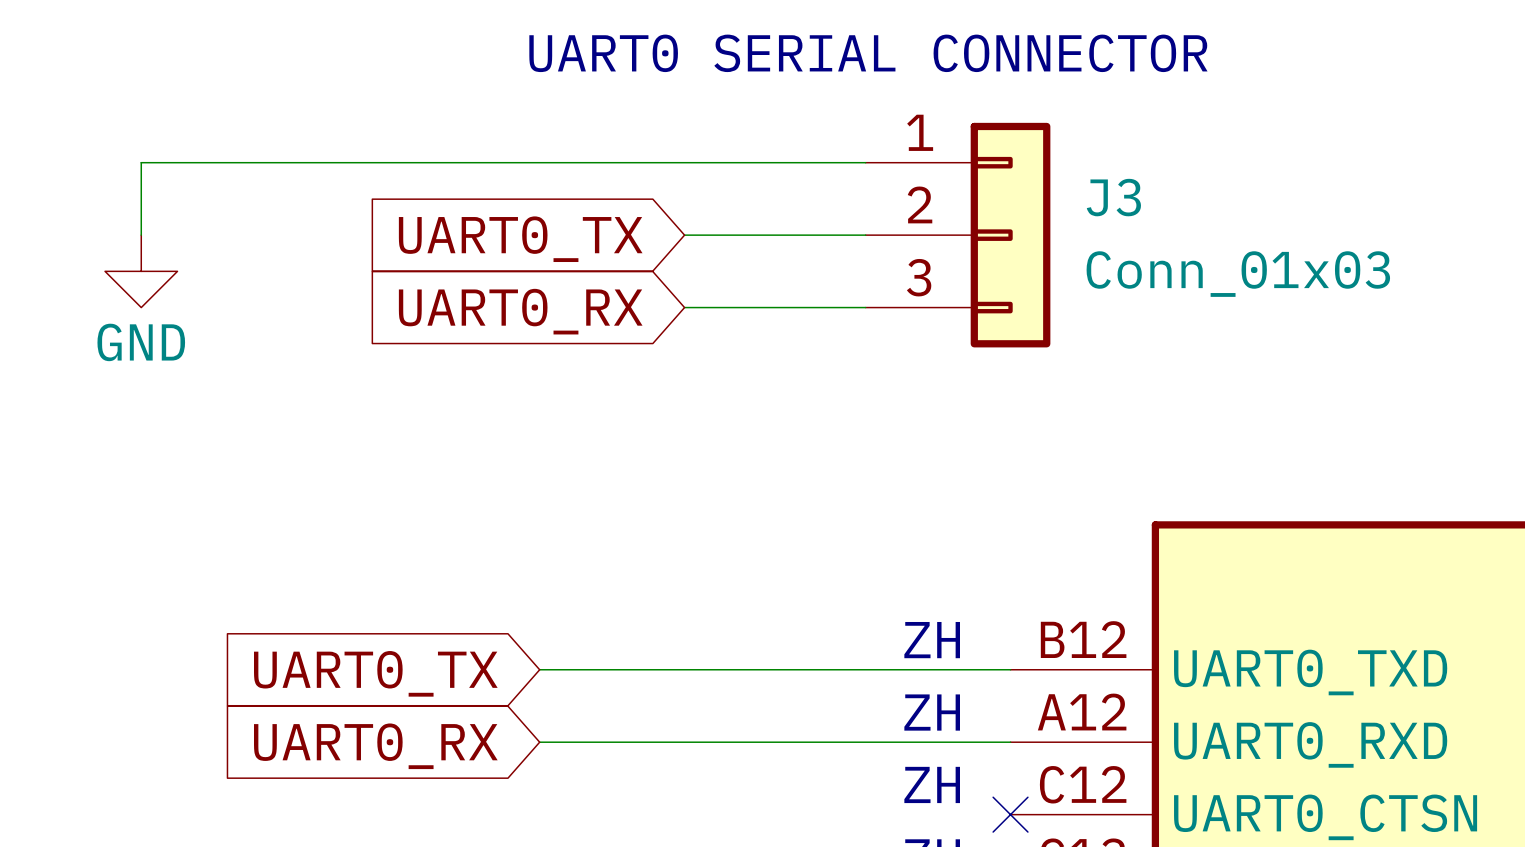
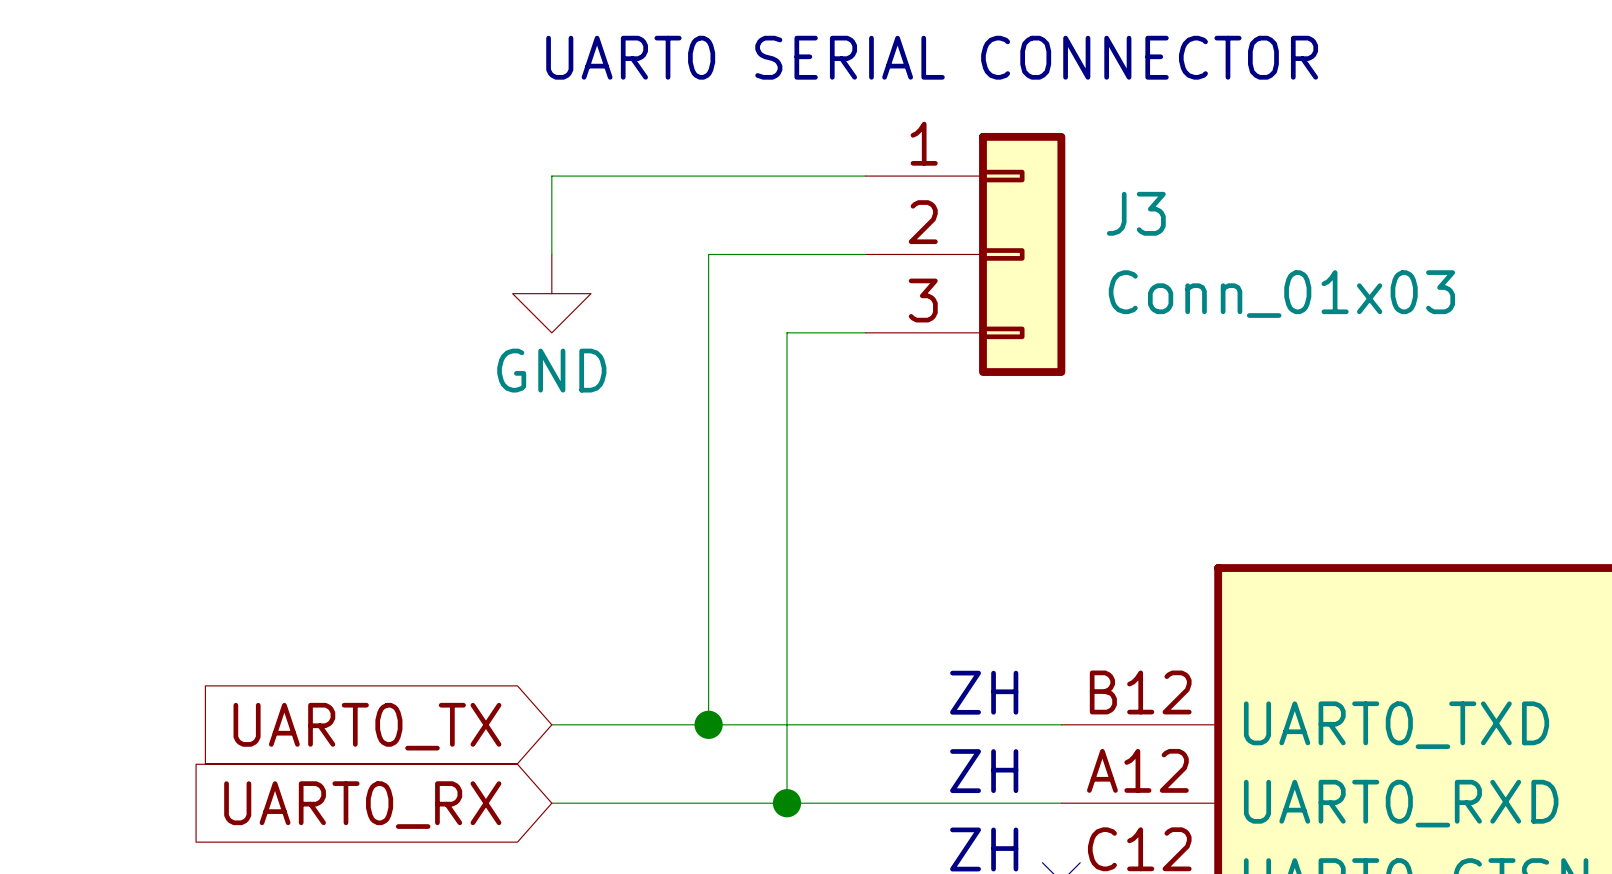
wire: (539, 162) (141, 162) (141, 235) -> (551, 176) (551, 254)
wire: none -> (708, 254) (708, 724)
J3 position: (958, 235) -> (965, 254)
global label: UART0_TX (520, 239) -> none
power symbol position: GND (141, 271) -> GND (551, 293)
wire: (684, 307) (756, 307) -> (787, 803) (787, 332)
global label: UART0_RX (520, 311) -> none
junction: none -> (708, 724)
junction: none -> (787, 803)

